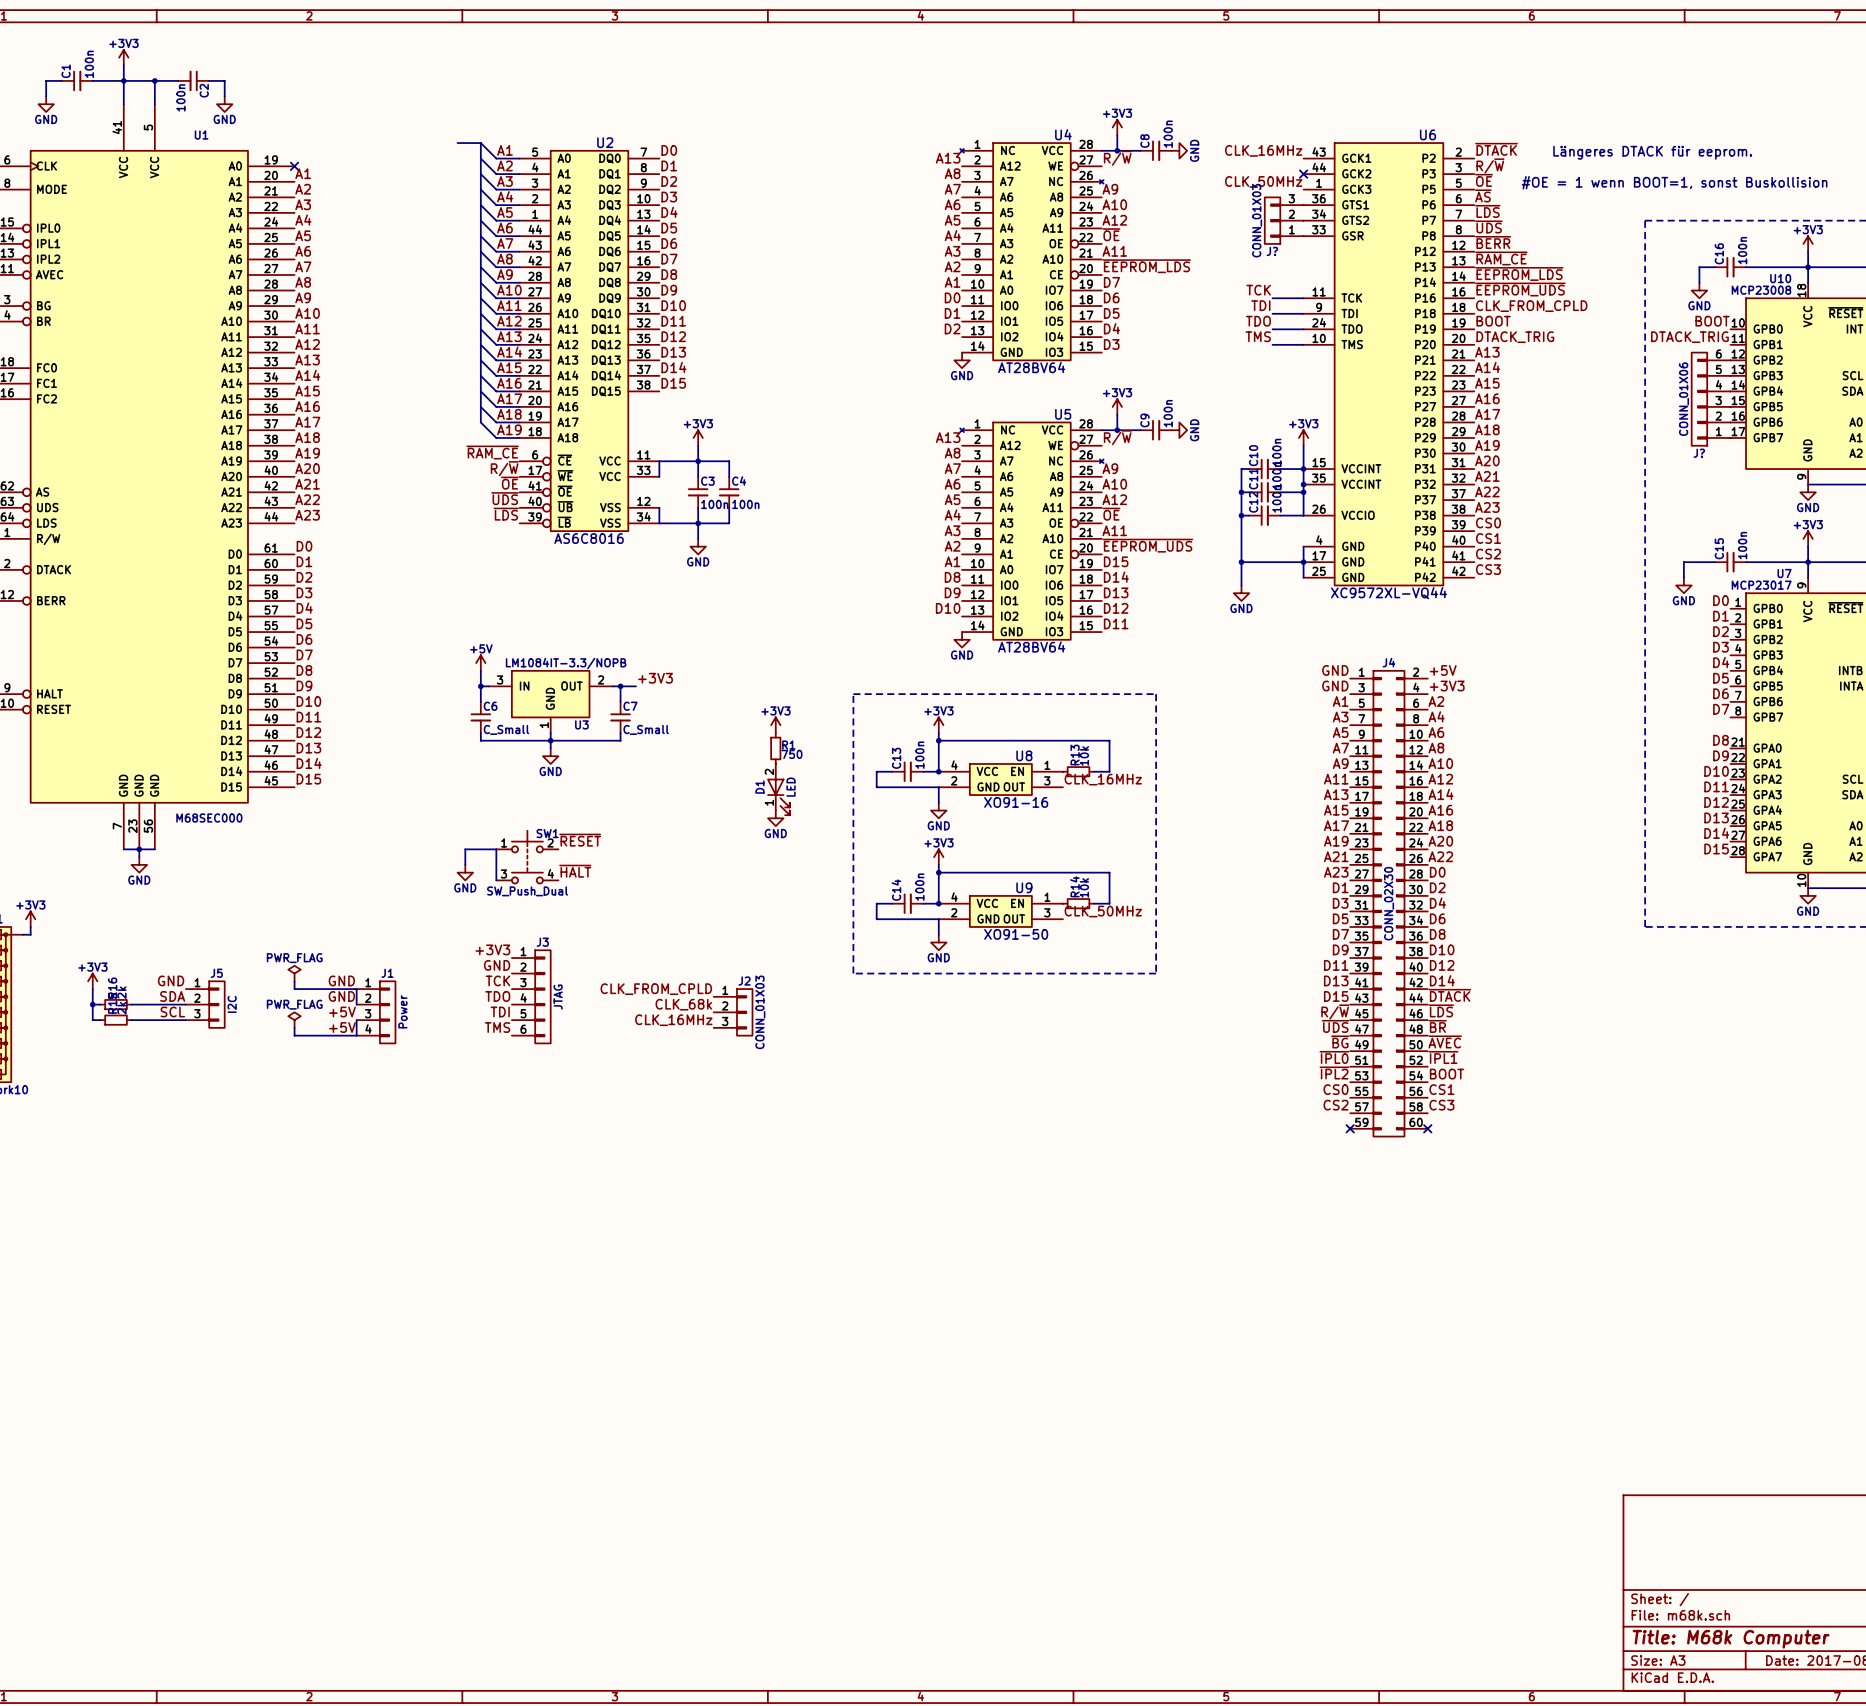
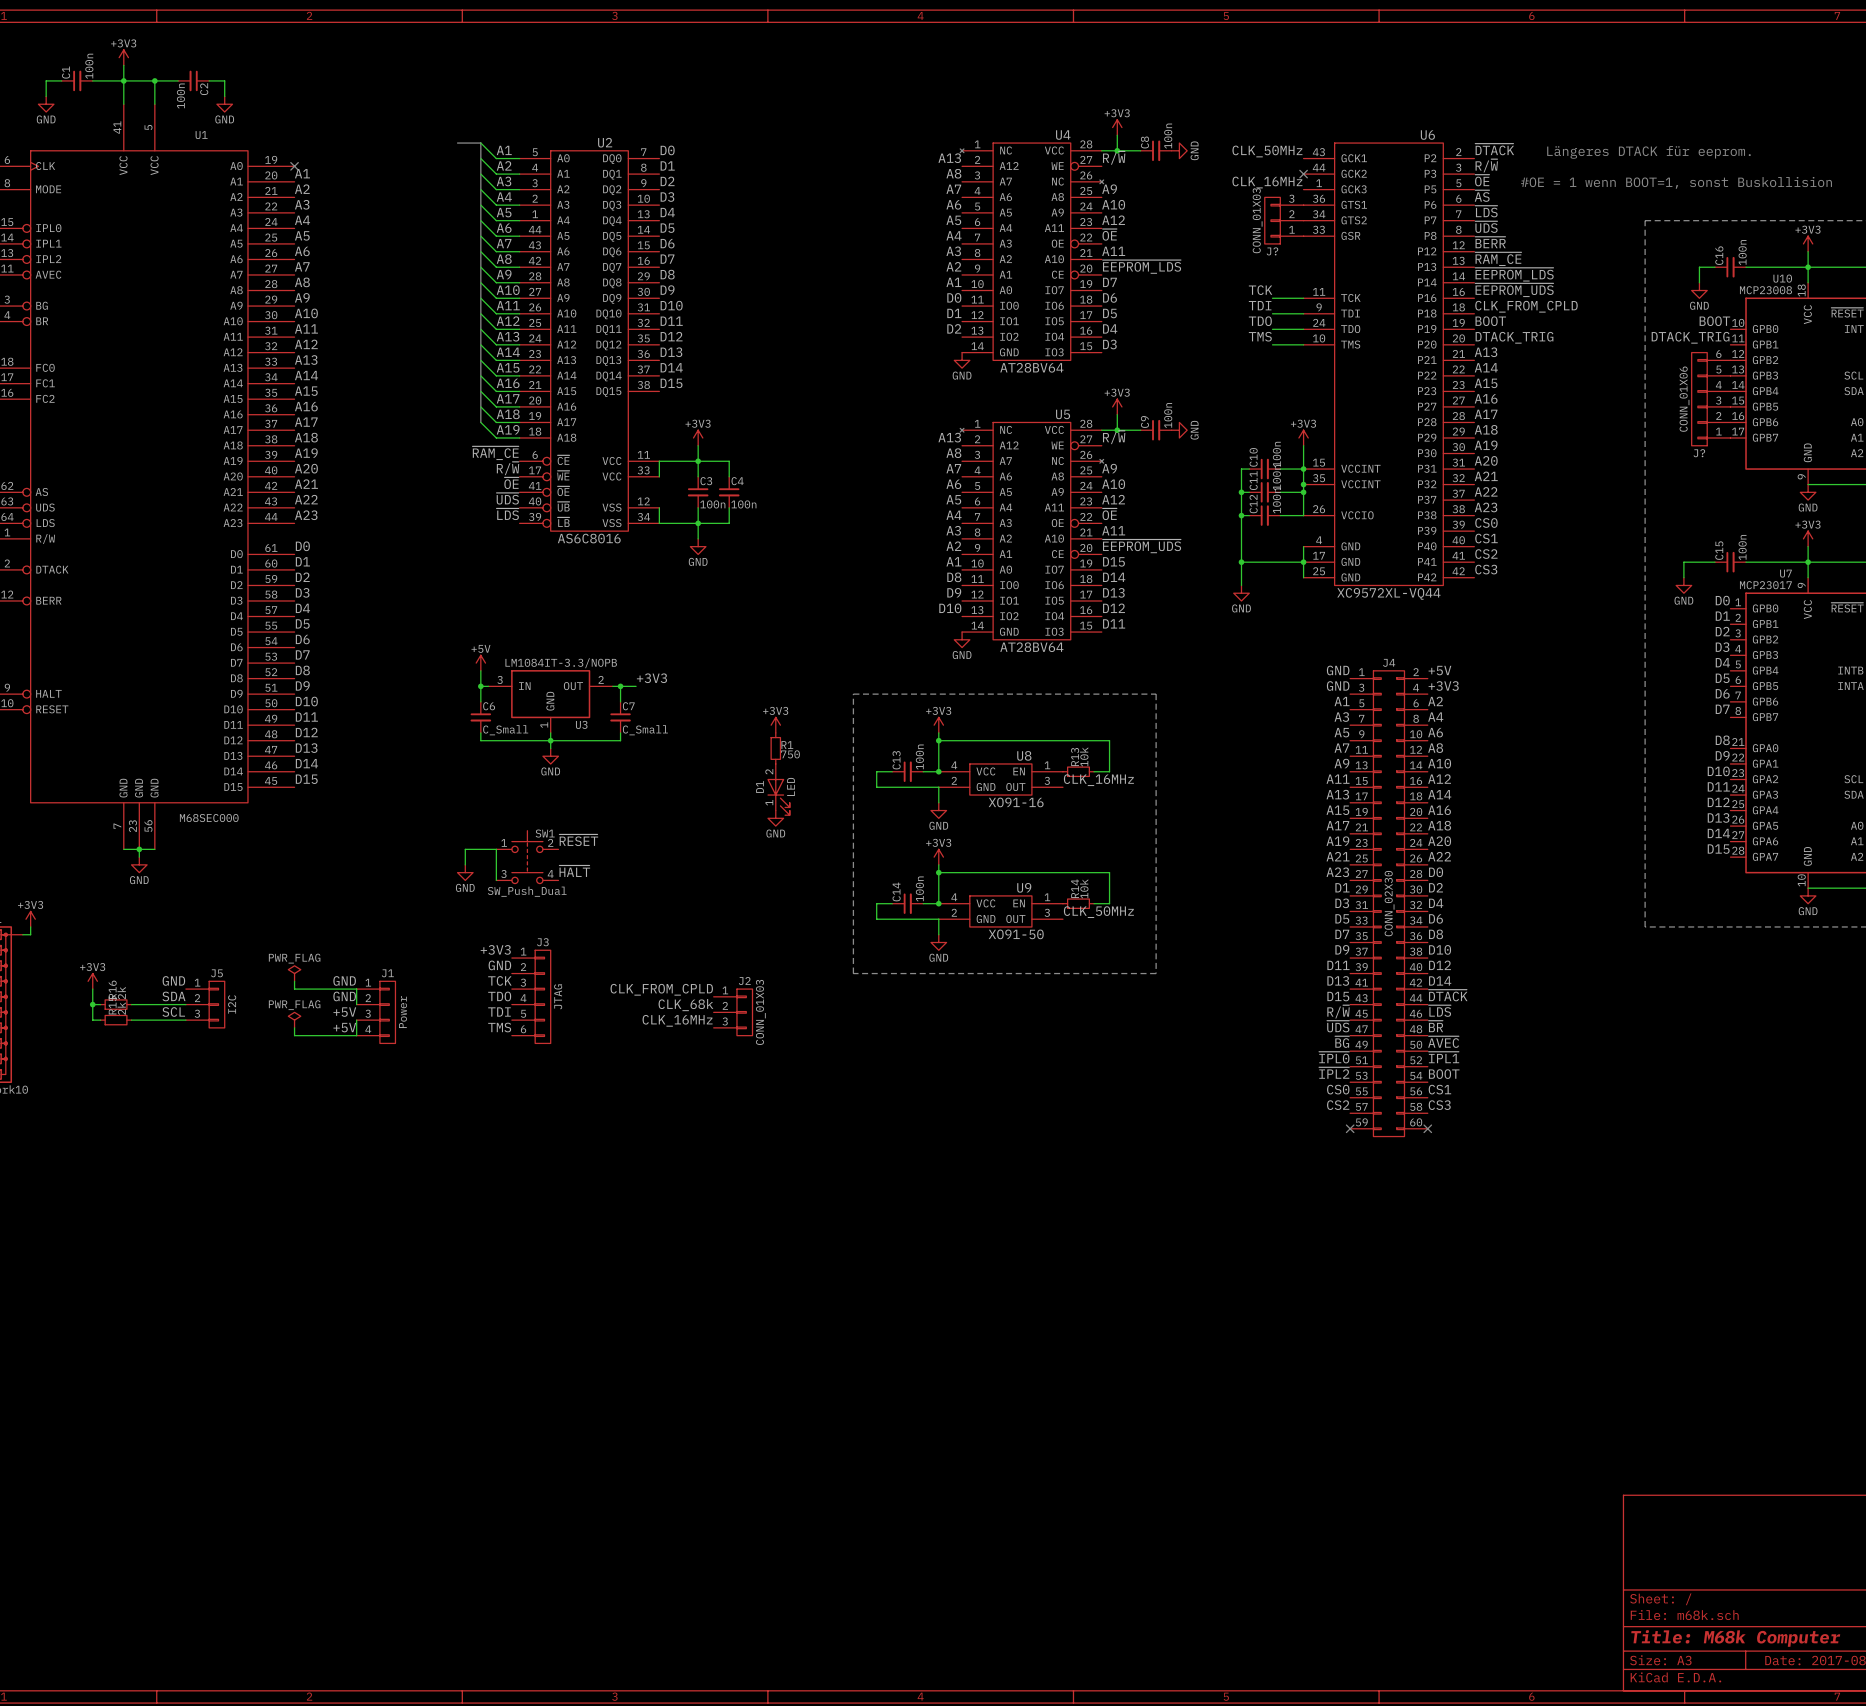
label: CLK_16MHz (1263, 150) -> CLK_50MHz (1267, 151)
label: CLK_50MHz (1263, 181) -> CLK_16MHz (1267, 182)

